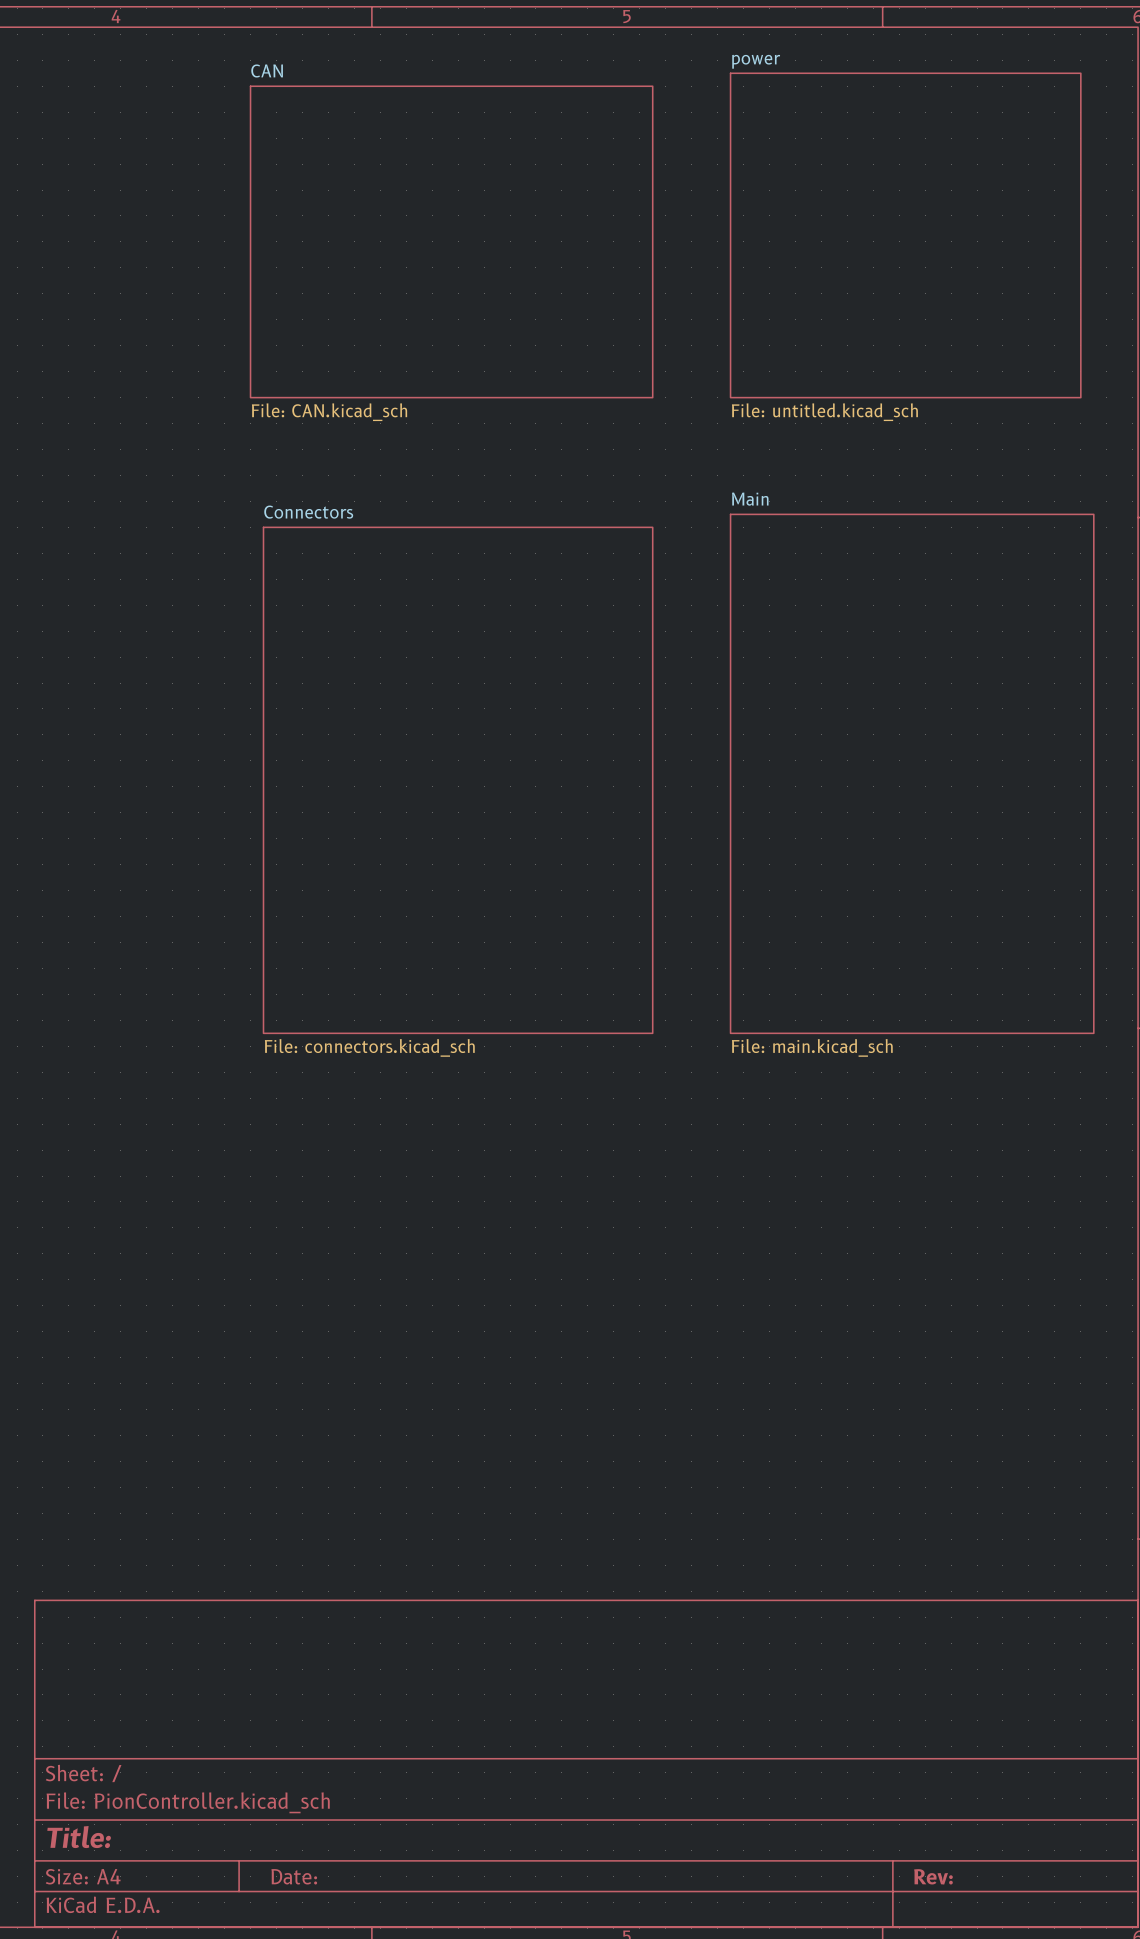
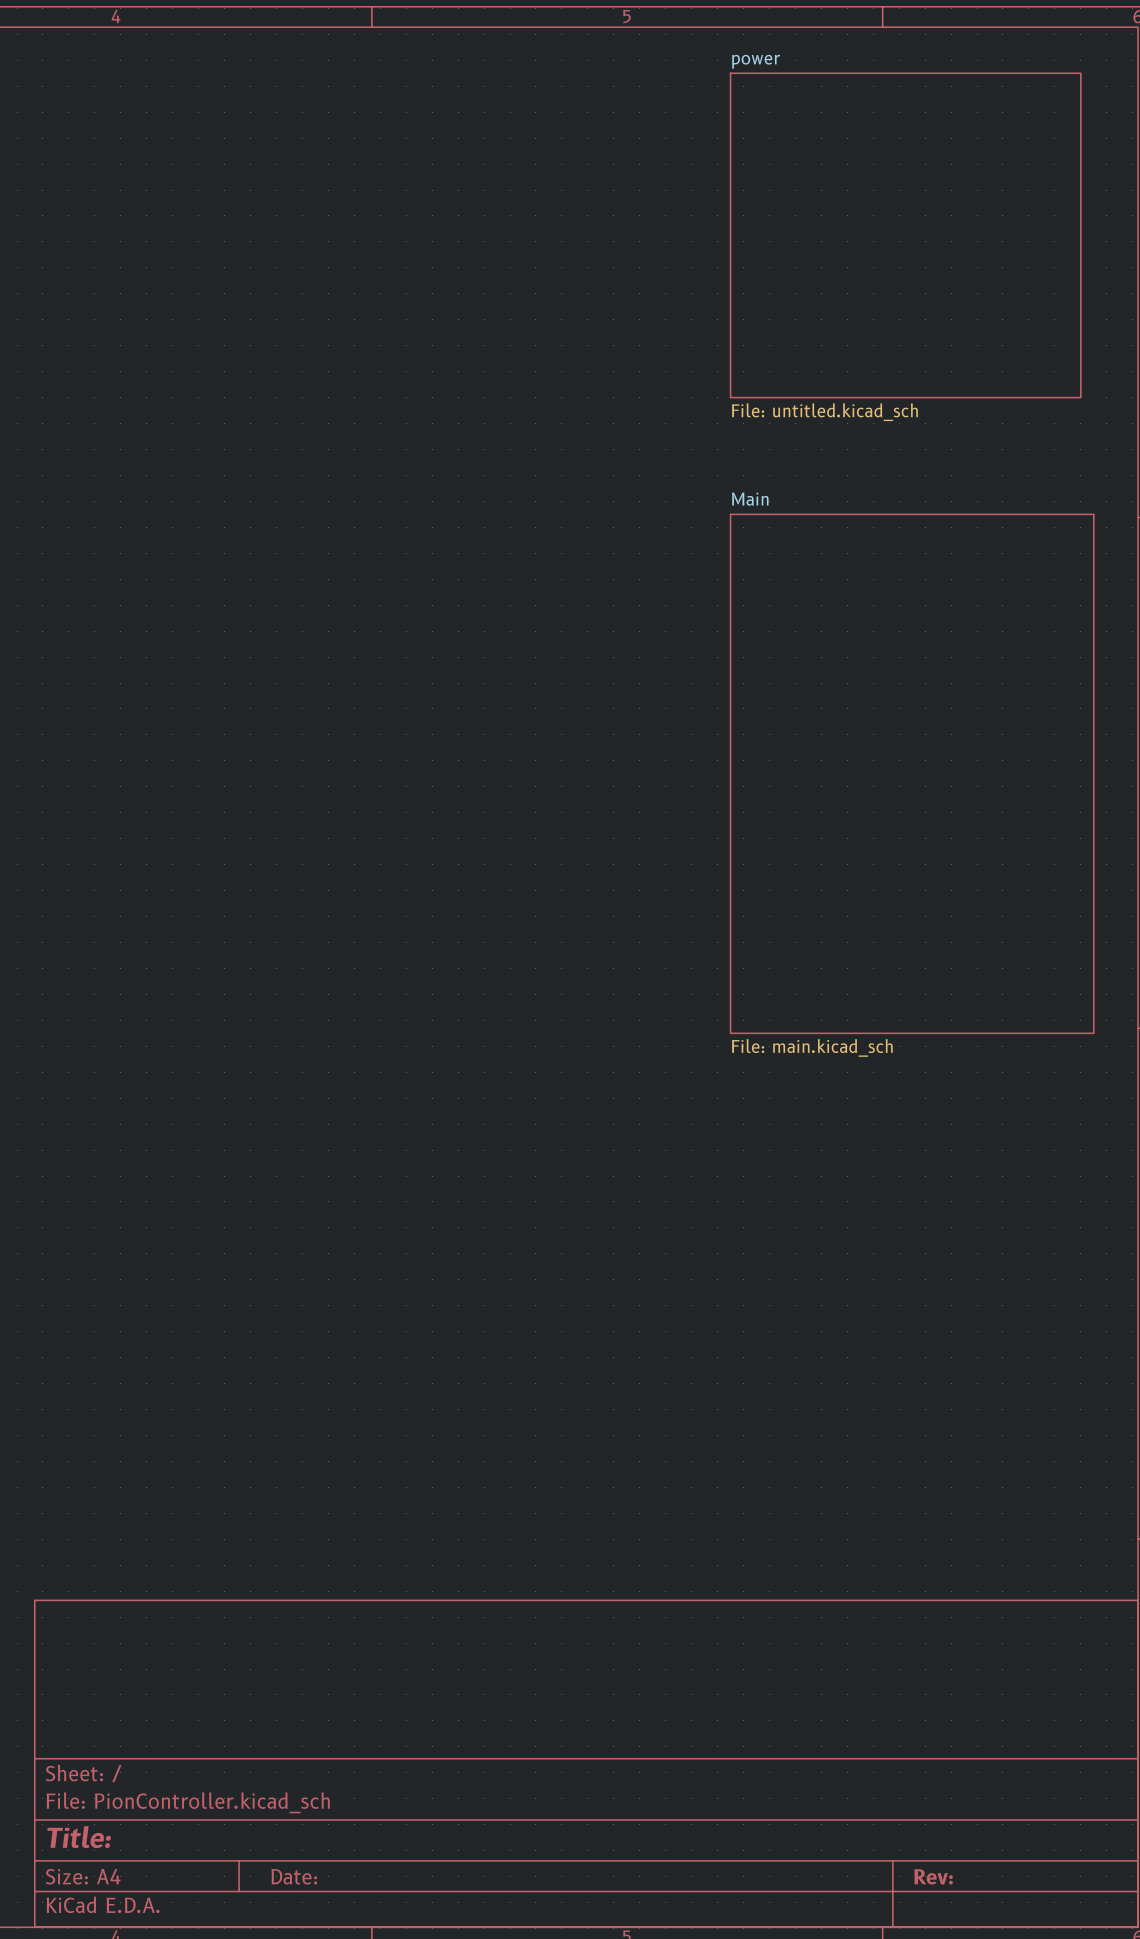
sheet CAN: File: CAN.kicad_sch (451, 241) -> none
sheet Connectors: File: connectors.kicad_sch (458, 780) -> none

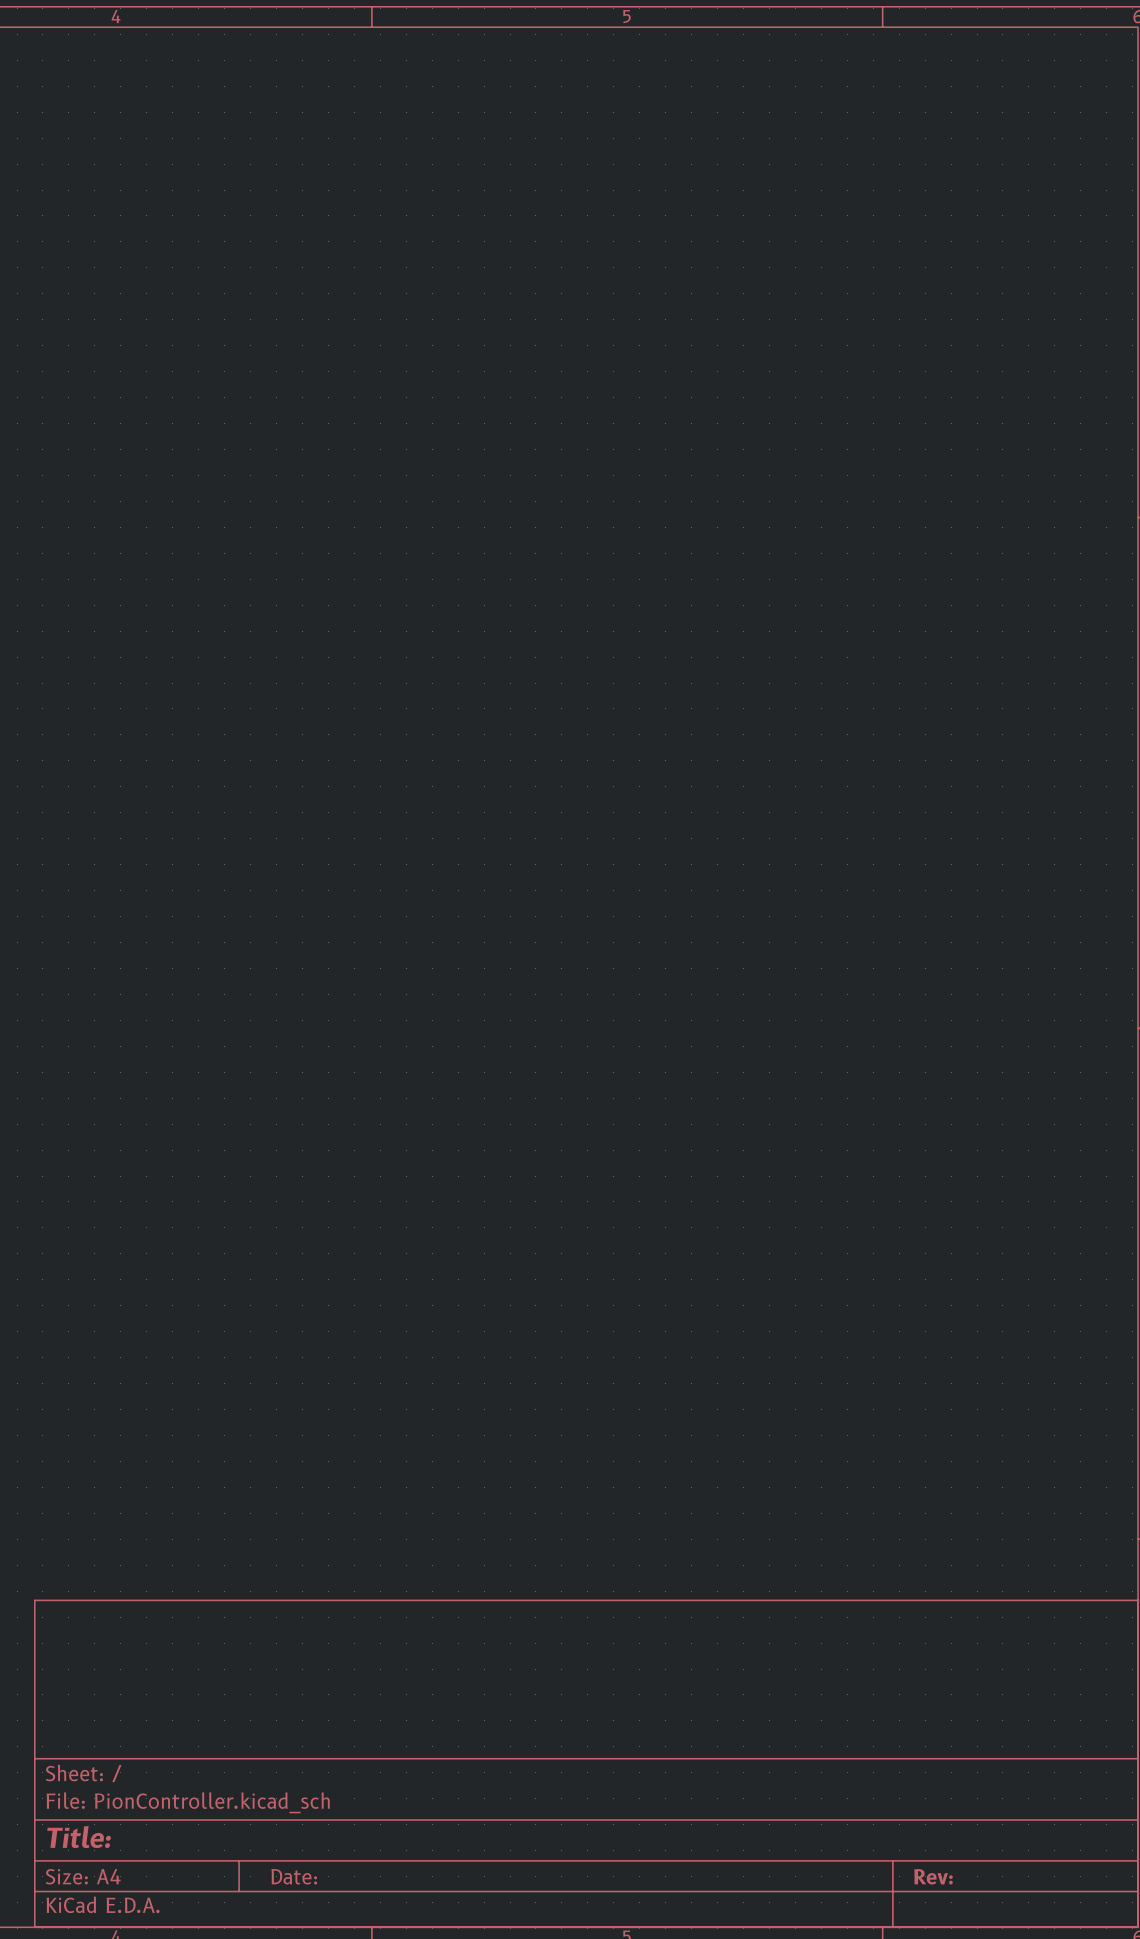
sheet power: File: untitled.kicad_sch (905, 235) -> none
sheet Main: File: main.kicad_sch (912, 773) -> none

